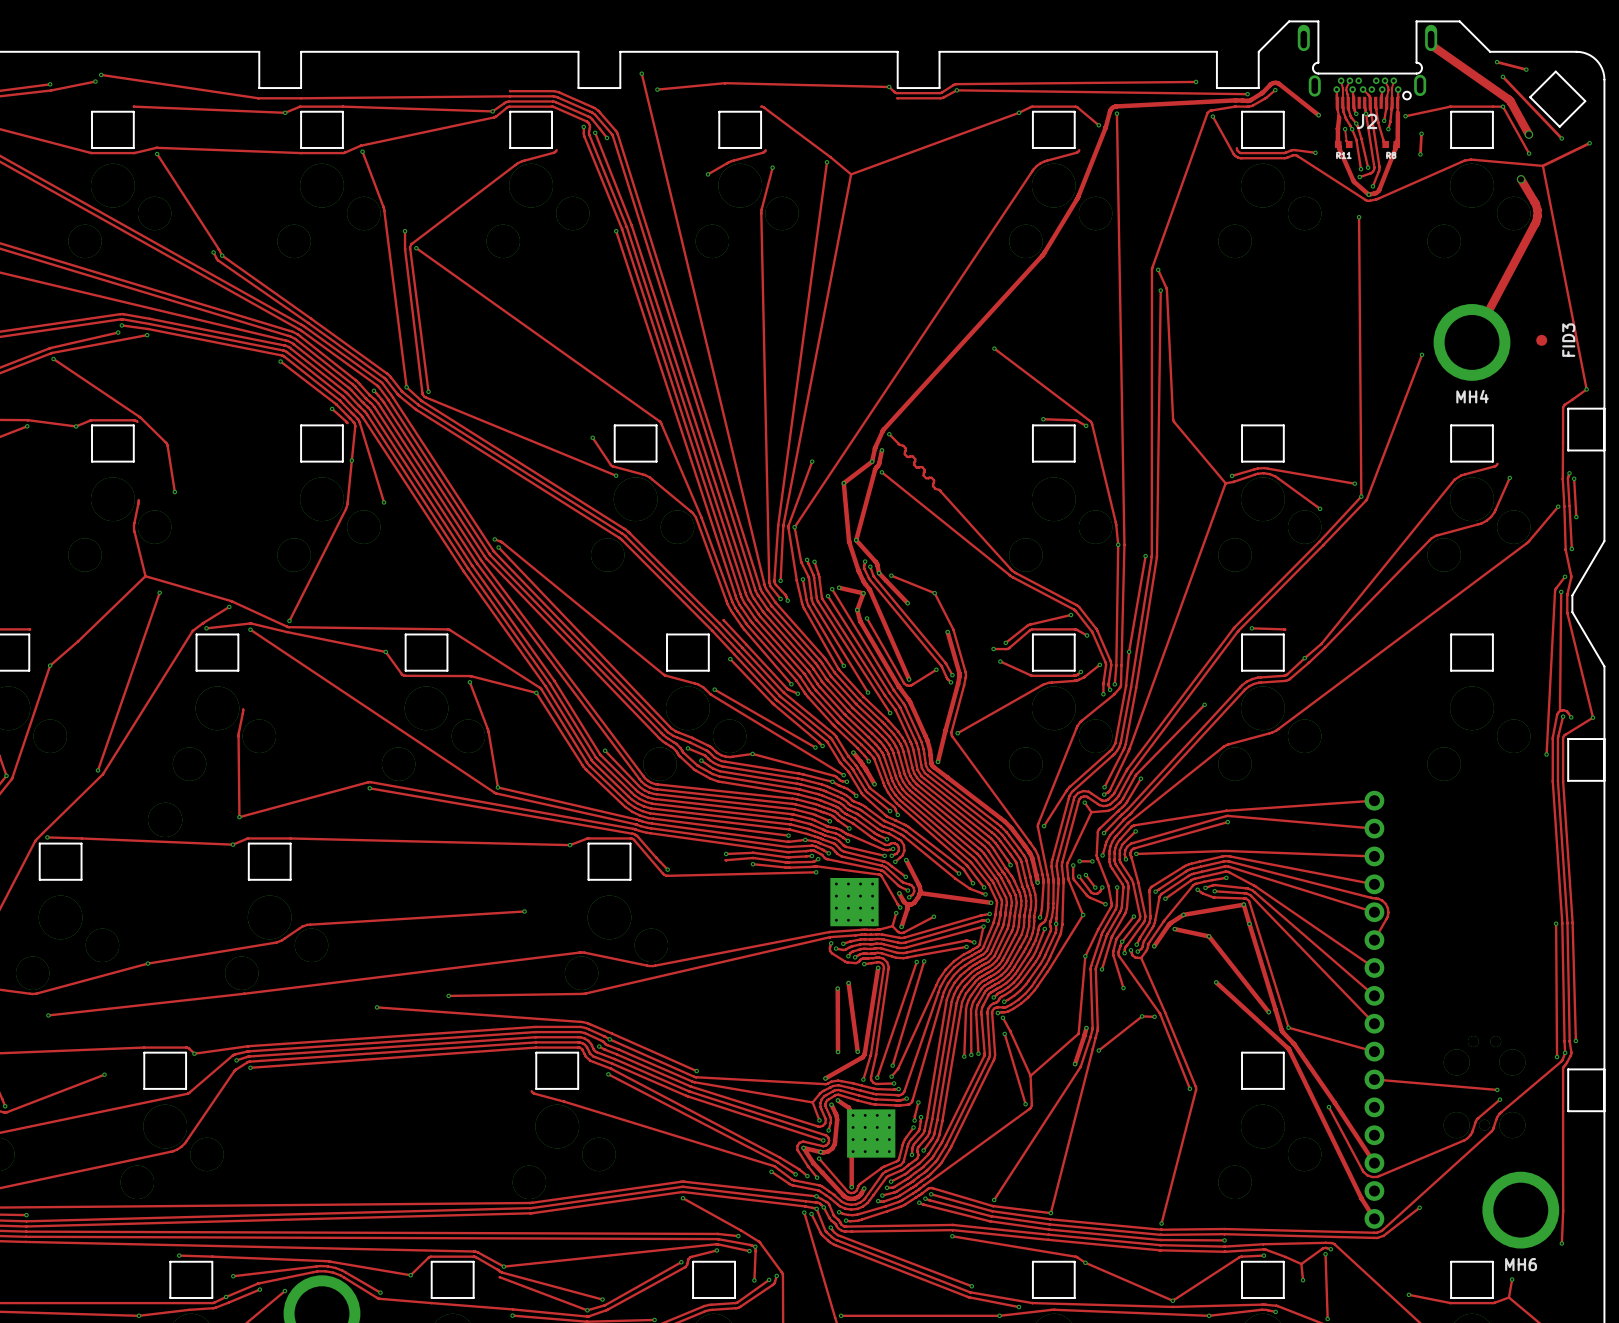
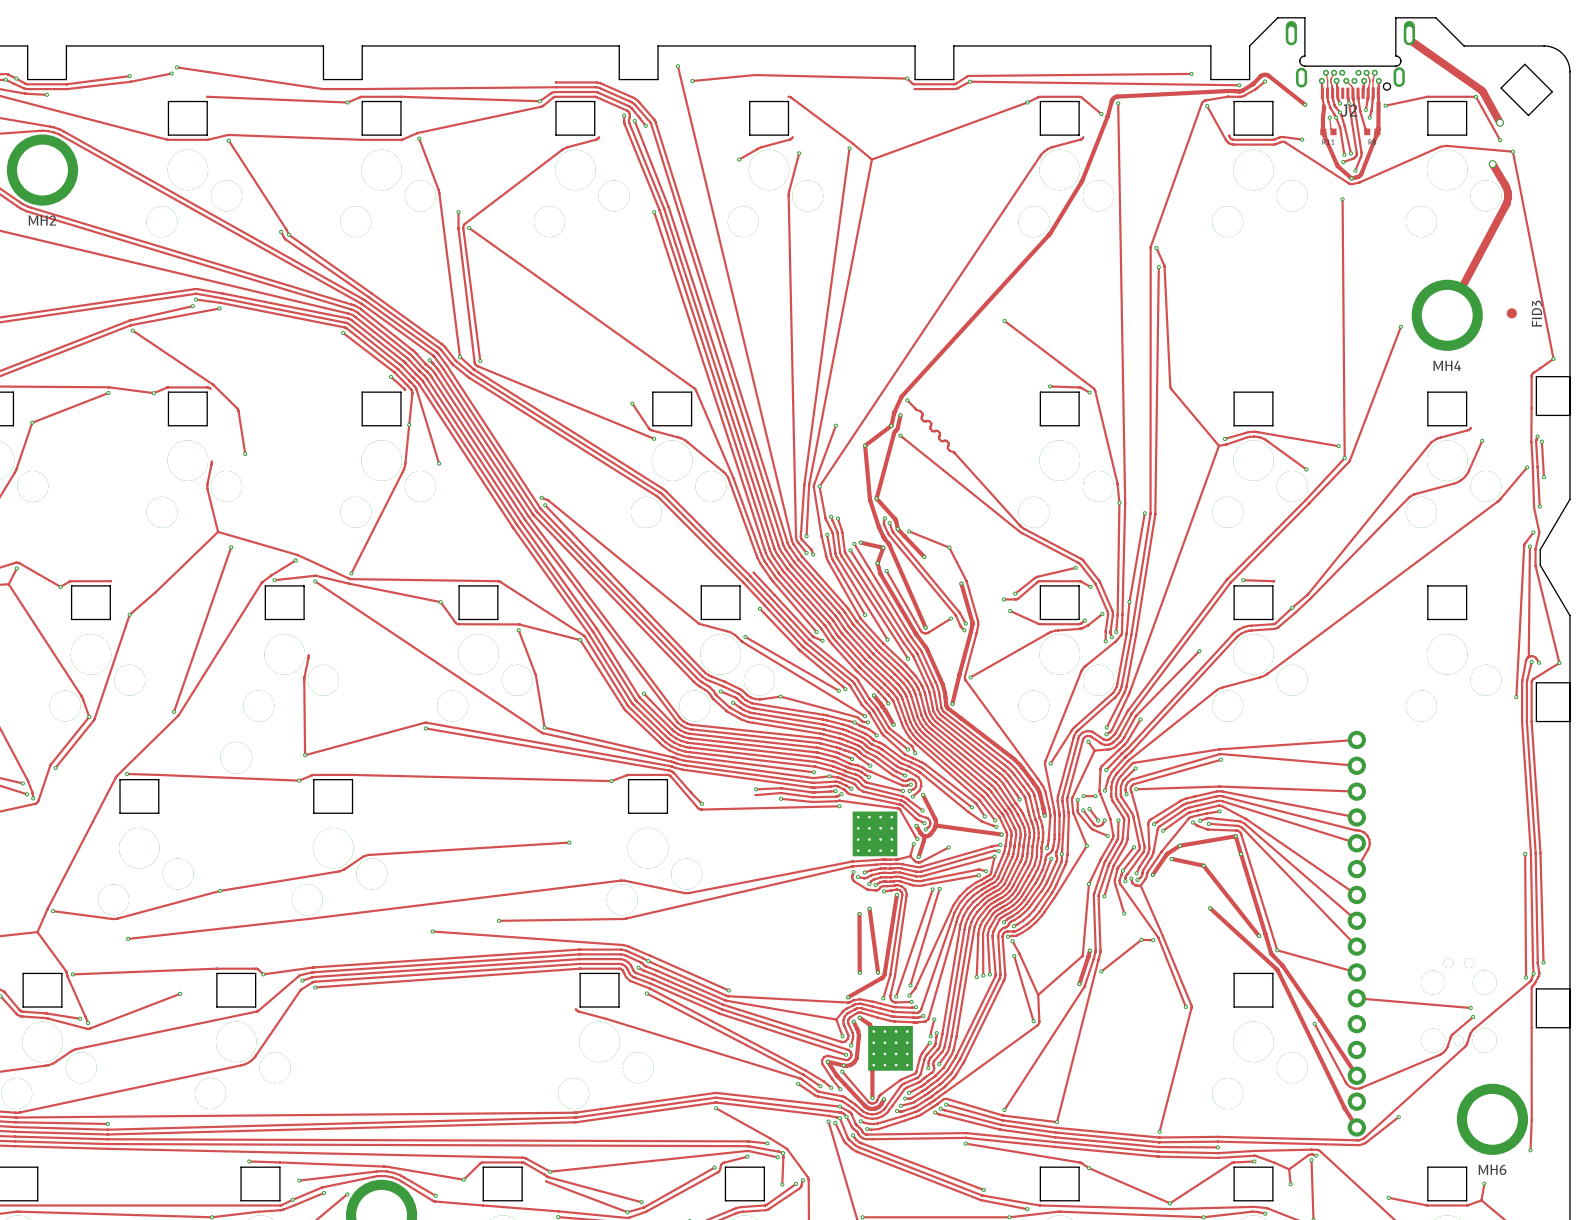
track: (1497, 62) (1526, 69) -> none
via: (1497, 62) -> none
via: (1526, 69) -> none
track: (1502, 76) (1561, 138) -> none
via: (1502, 76) -> none
track: (1421, 133) (1420, 154) -> none
via: (1421, 133) -> none
via: (1561, 138) -> none
track: (1589, 143) (1542, 165) -> none
via: (1589, 143) -> none
via: (1420, 154) -> none
via: none -> (1512, 151)

